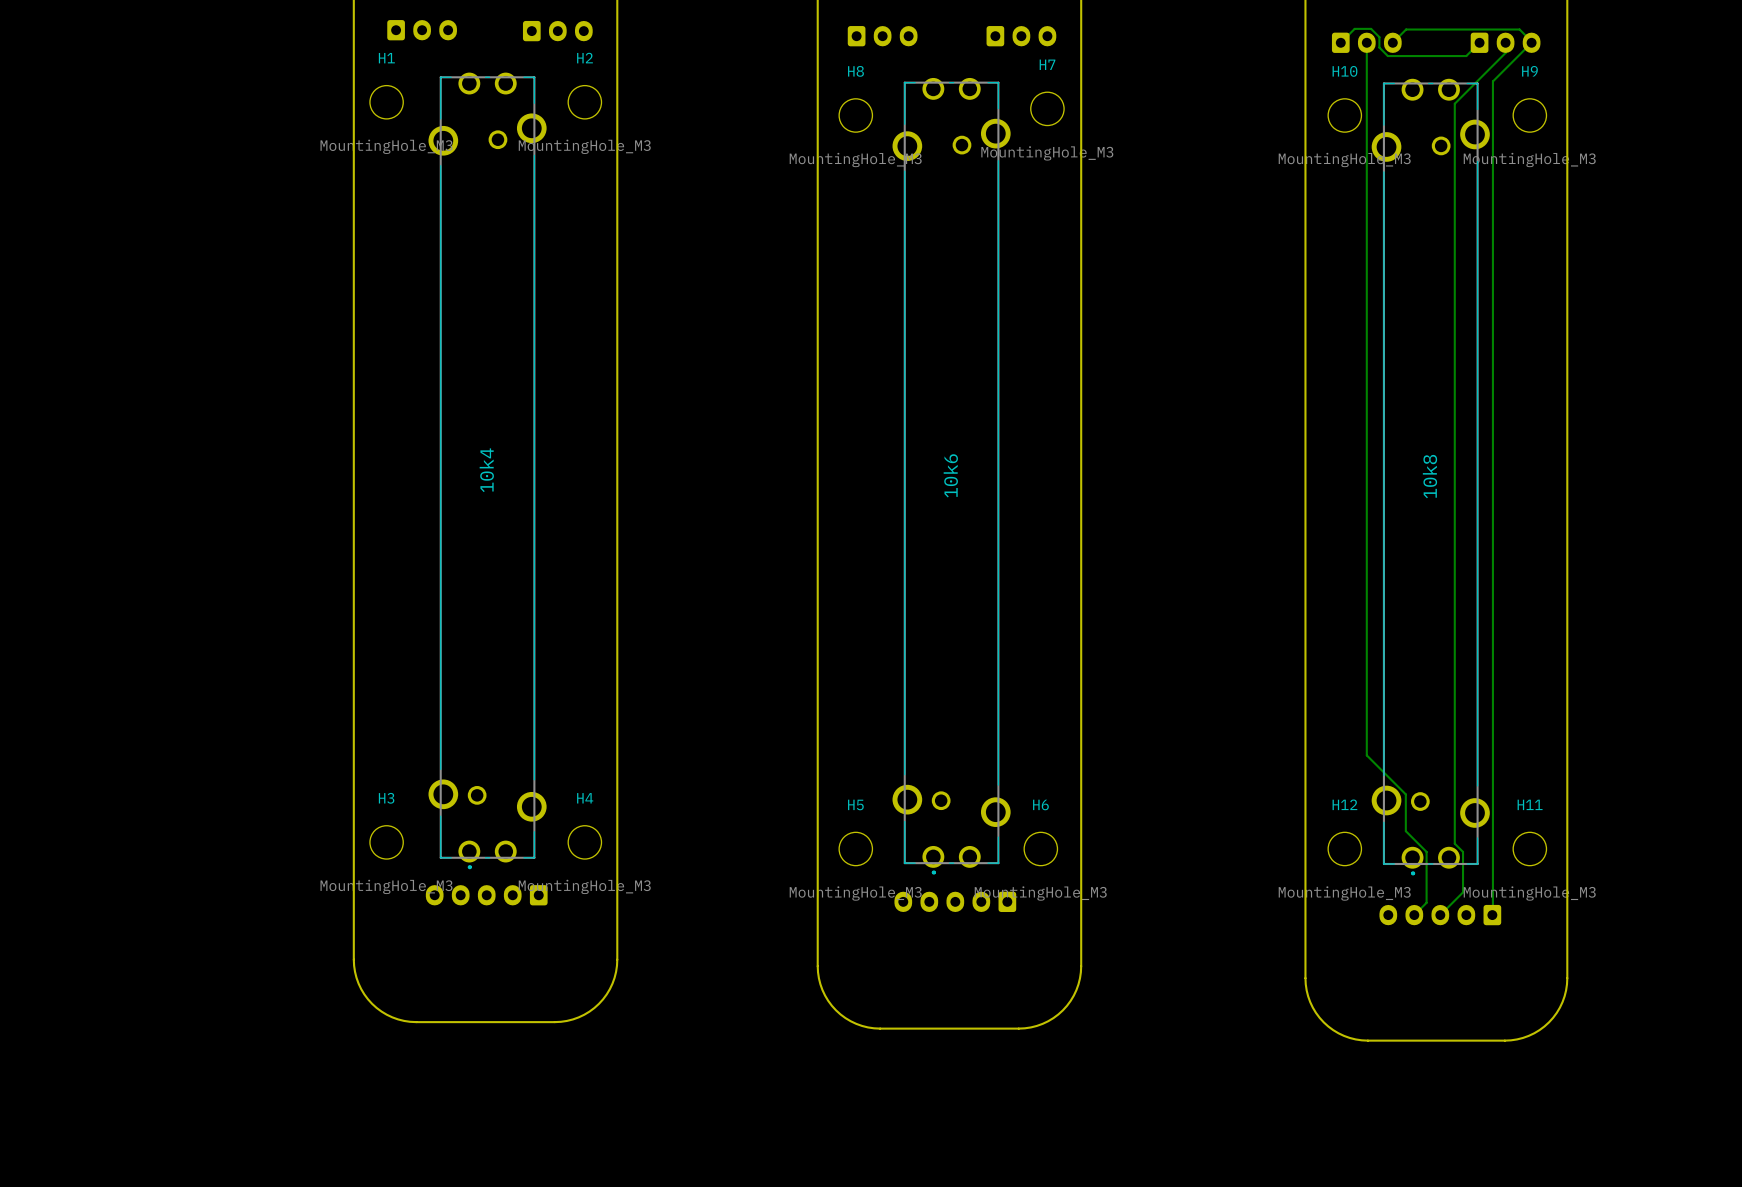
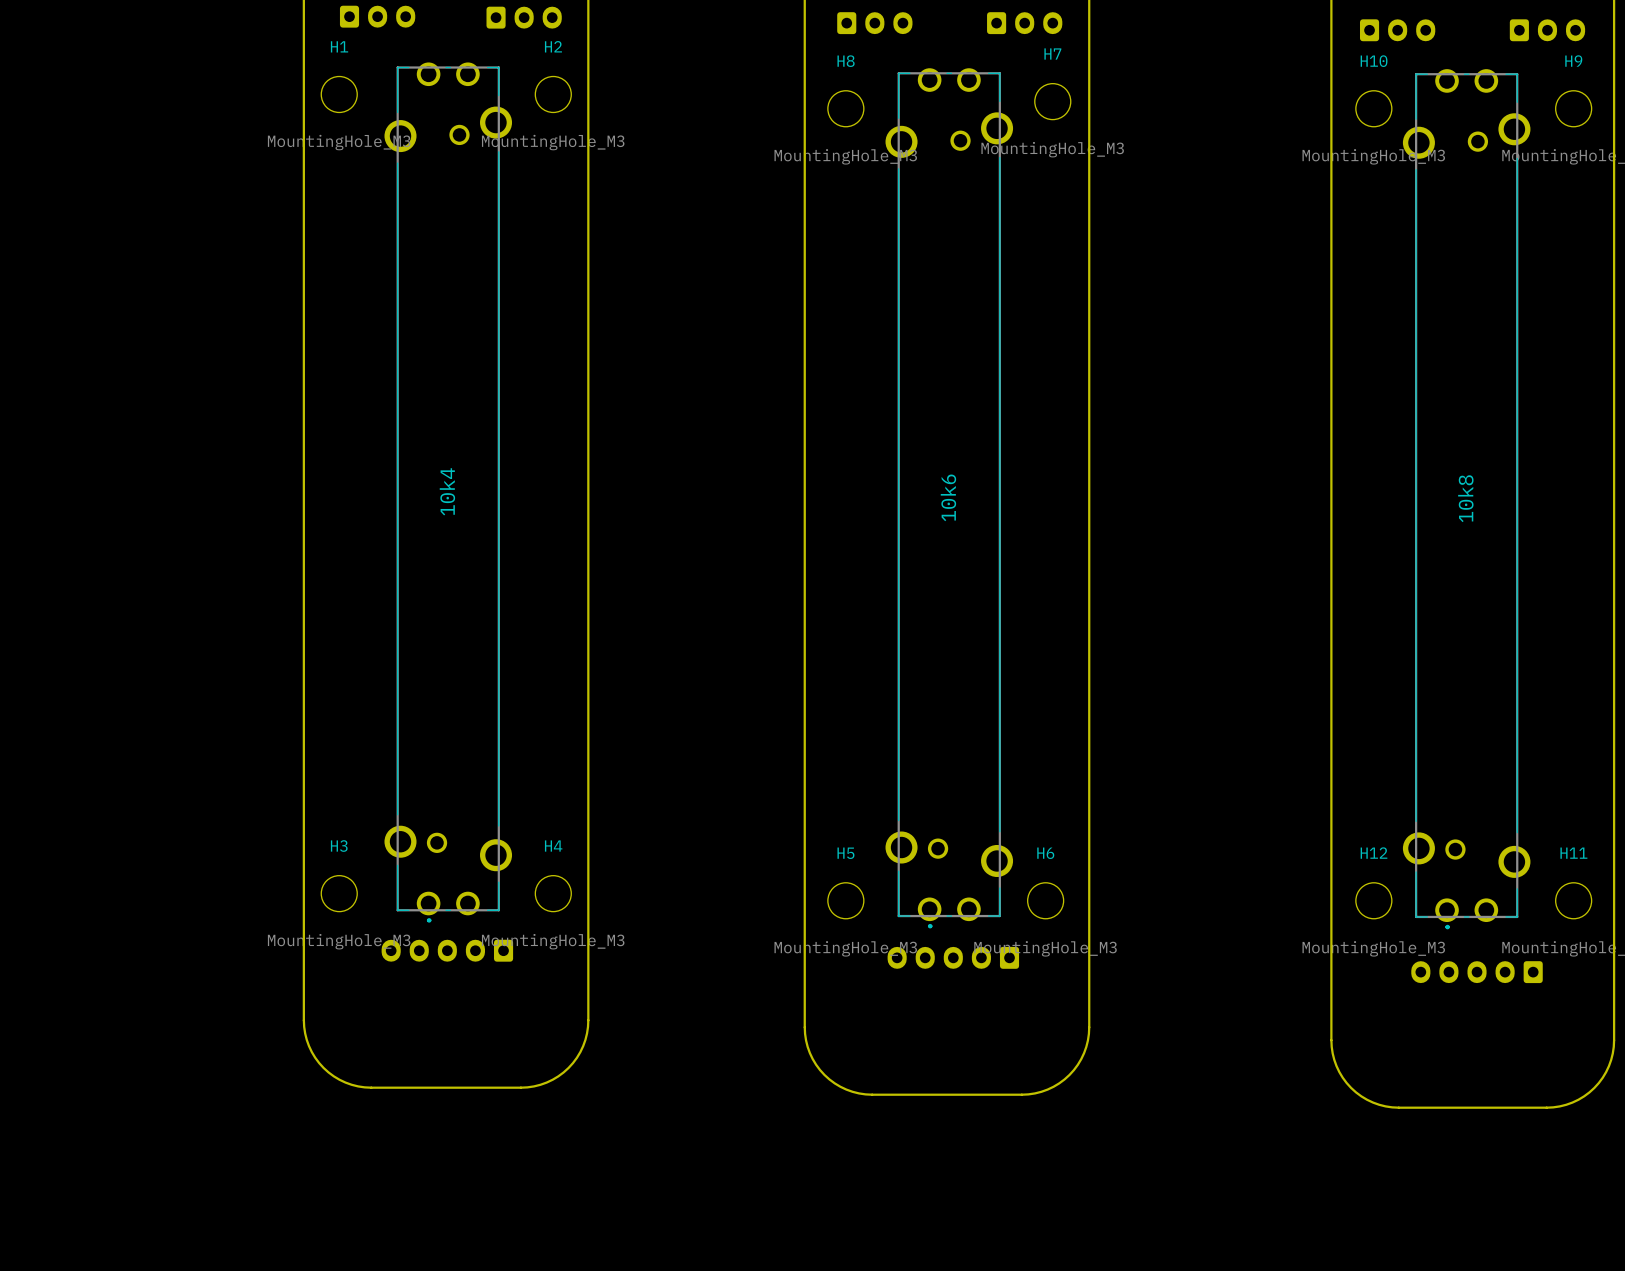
bottom track: (1340, 42) (1354, 28) (1371, 28) (1379, 37) (1379, 47) (1387, 56) (1466, 56) (1479, 42) -> none
bottom track: (1366, 42) (1366, 755) (1405, 794) (1405, 831) (1426, 851) (1426, 902) (1414, 915) -> none
bottom track: (1392, 42) (1406, 29) (1519, 29) (1531, 41) (1492, 81) (1492, 915) -> none
bottom track: (1505, 42) (1505, 52) (1454, 103) (1454, 843) (1463, 851) (1463, 892) (1440, 915) -> none

